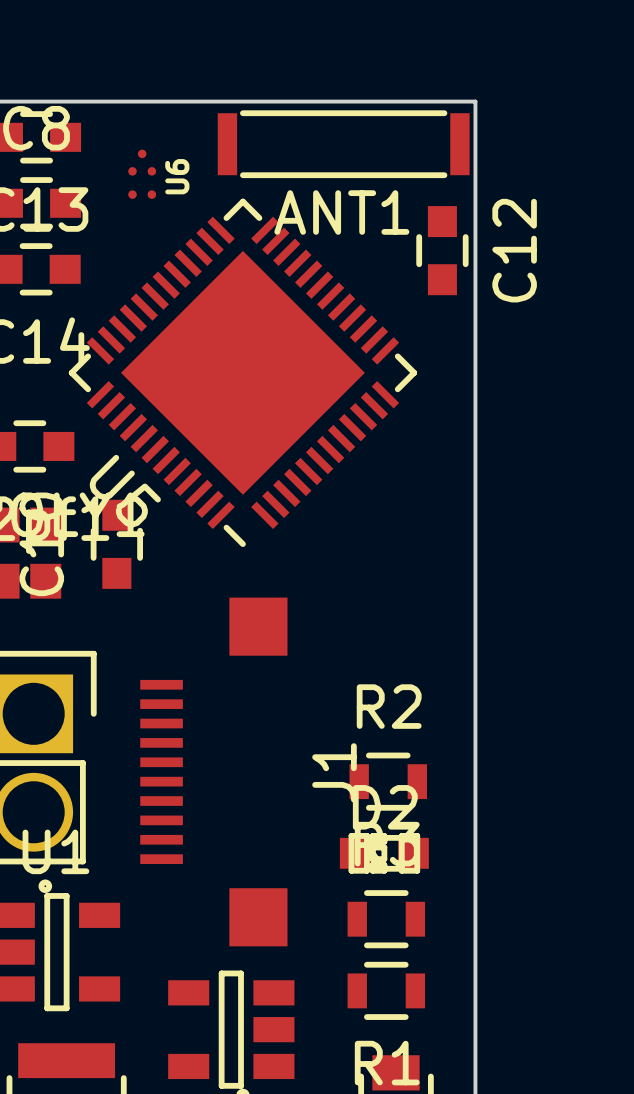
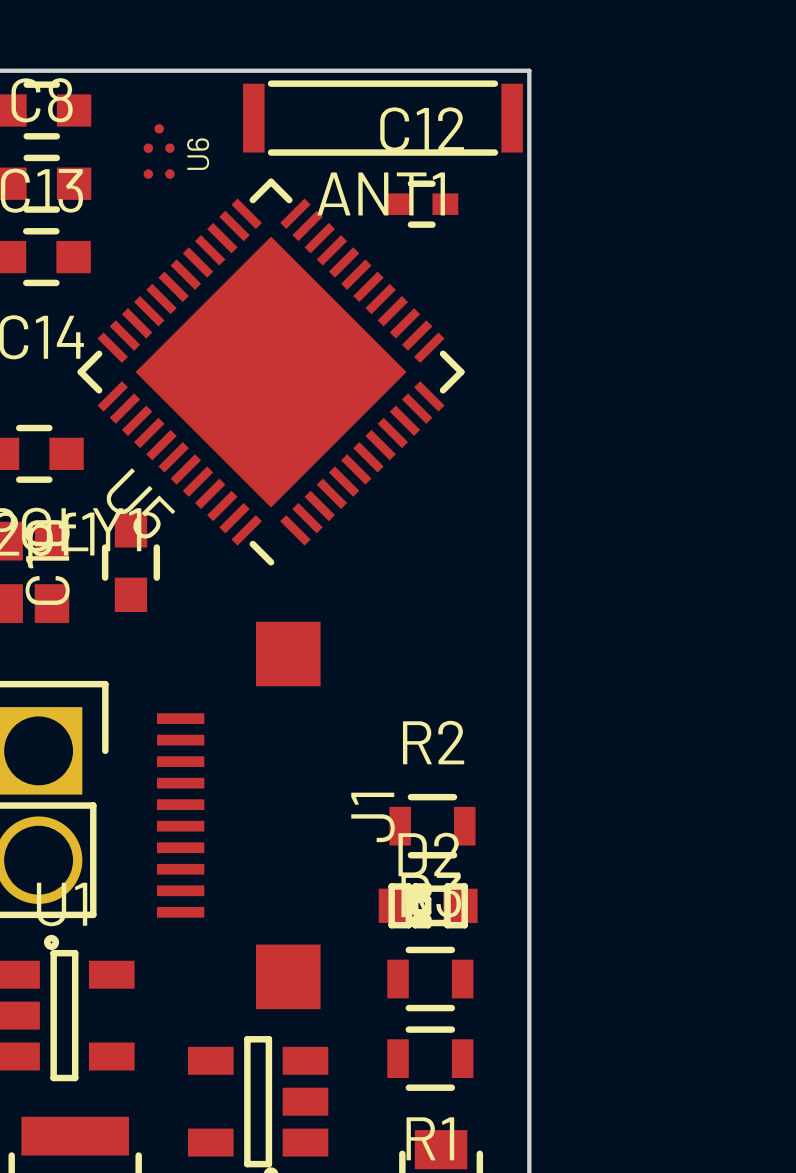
C12 footprint: [416, 206, 469, 296] -> [385, 180, 459, 228]
C12 name position: C12 (514, 250) -> C12 (422, 129)

